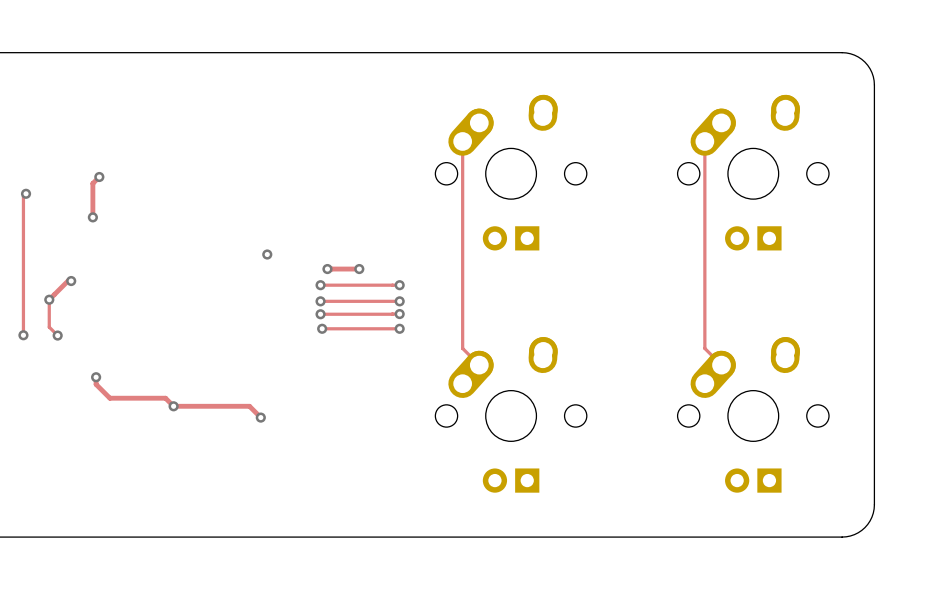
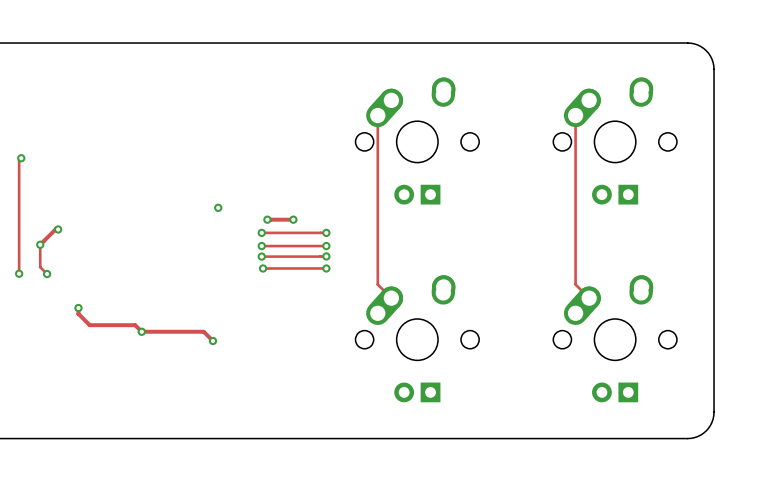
track: (99, 177) (92, 183) (92, 217) -> none
via: (99, 177) -> none
via: (92, 217) -> none

